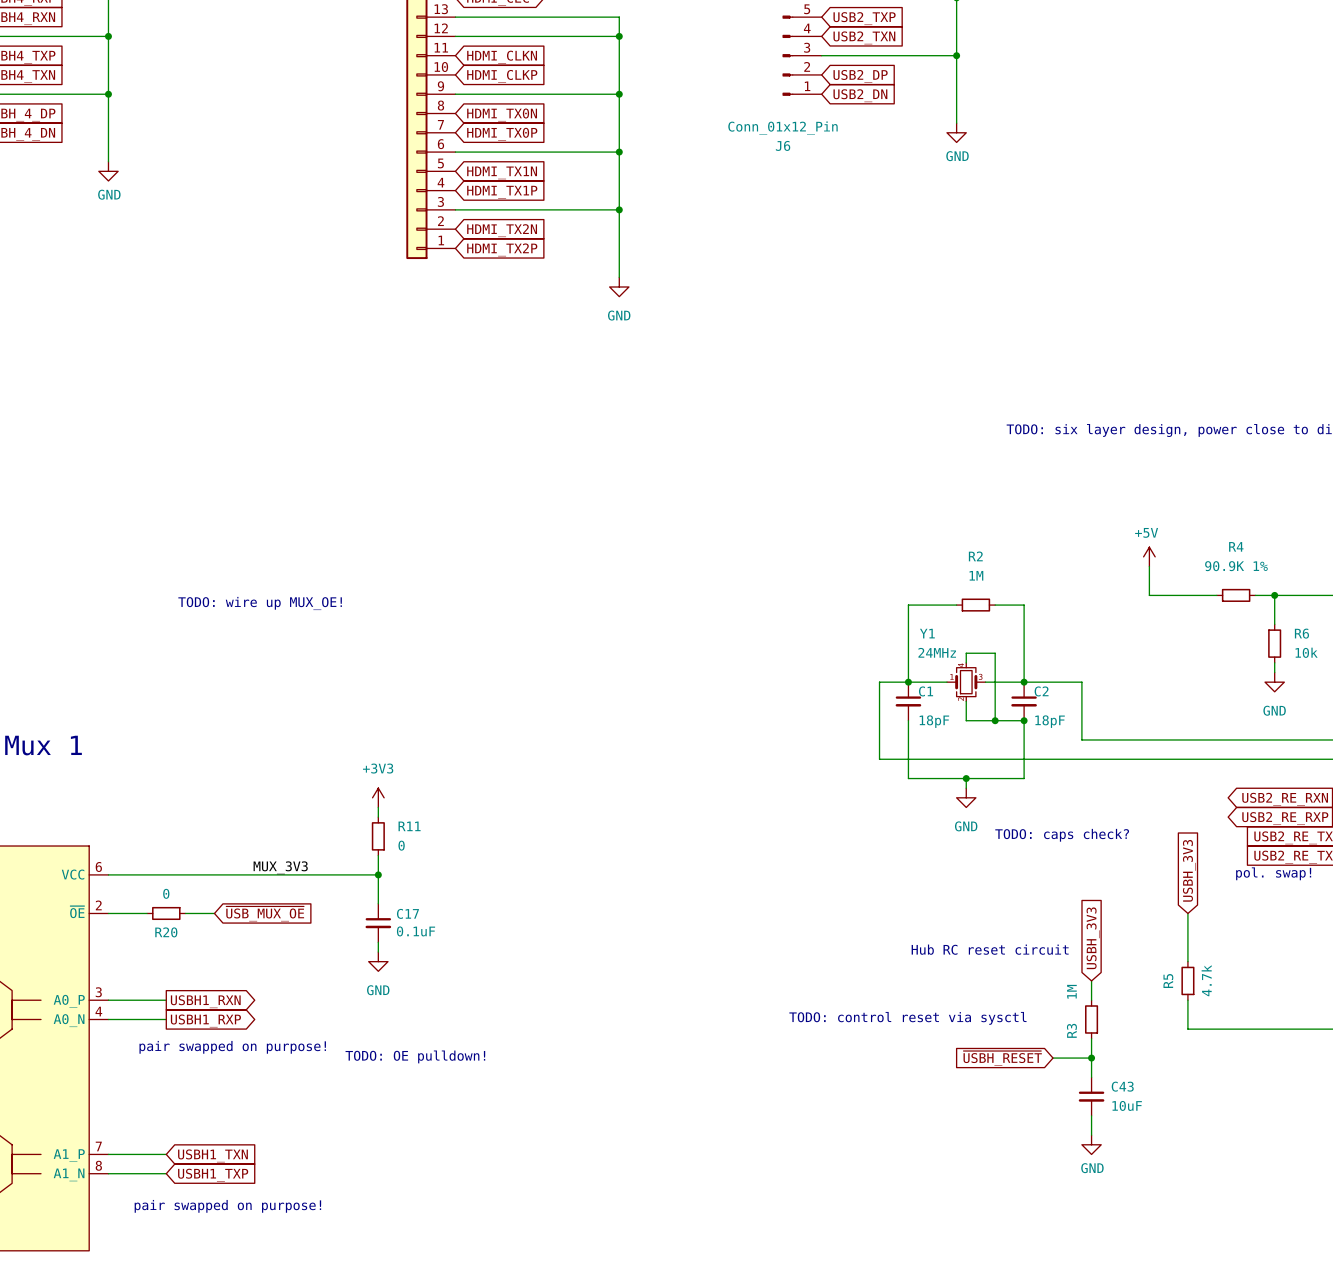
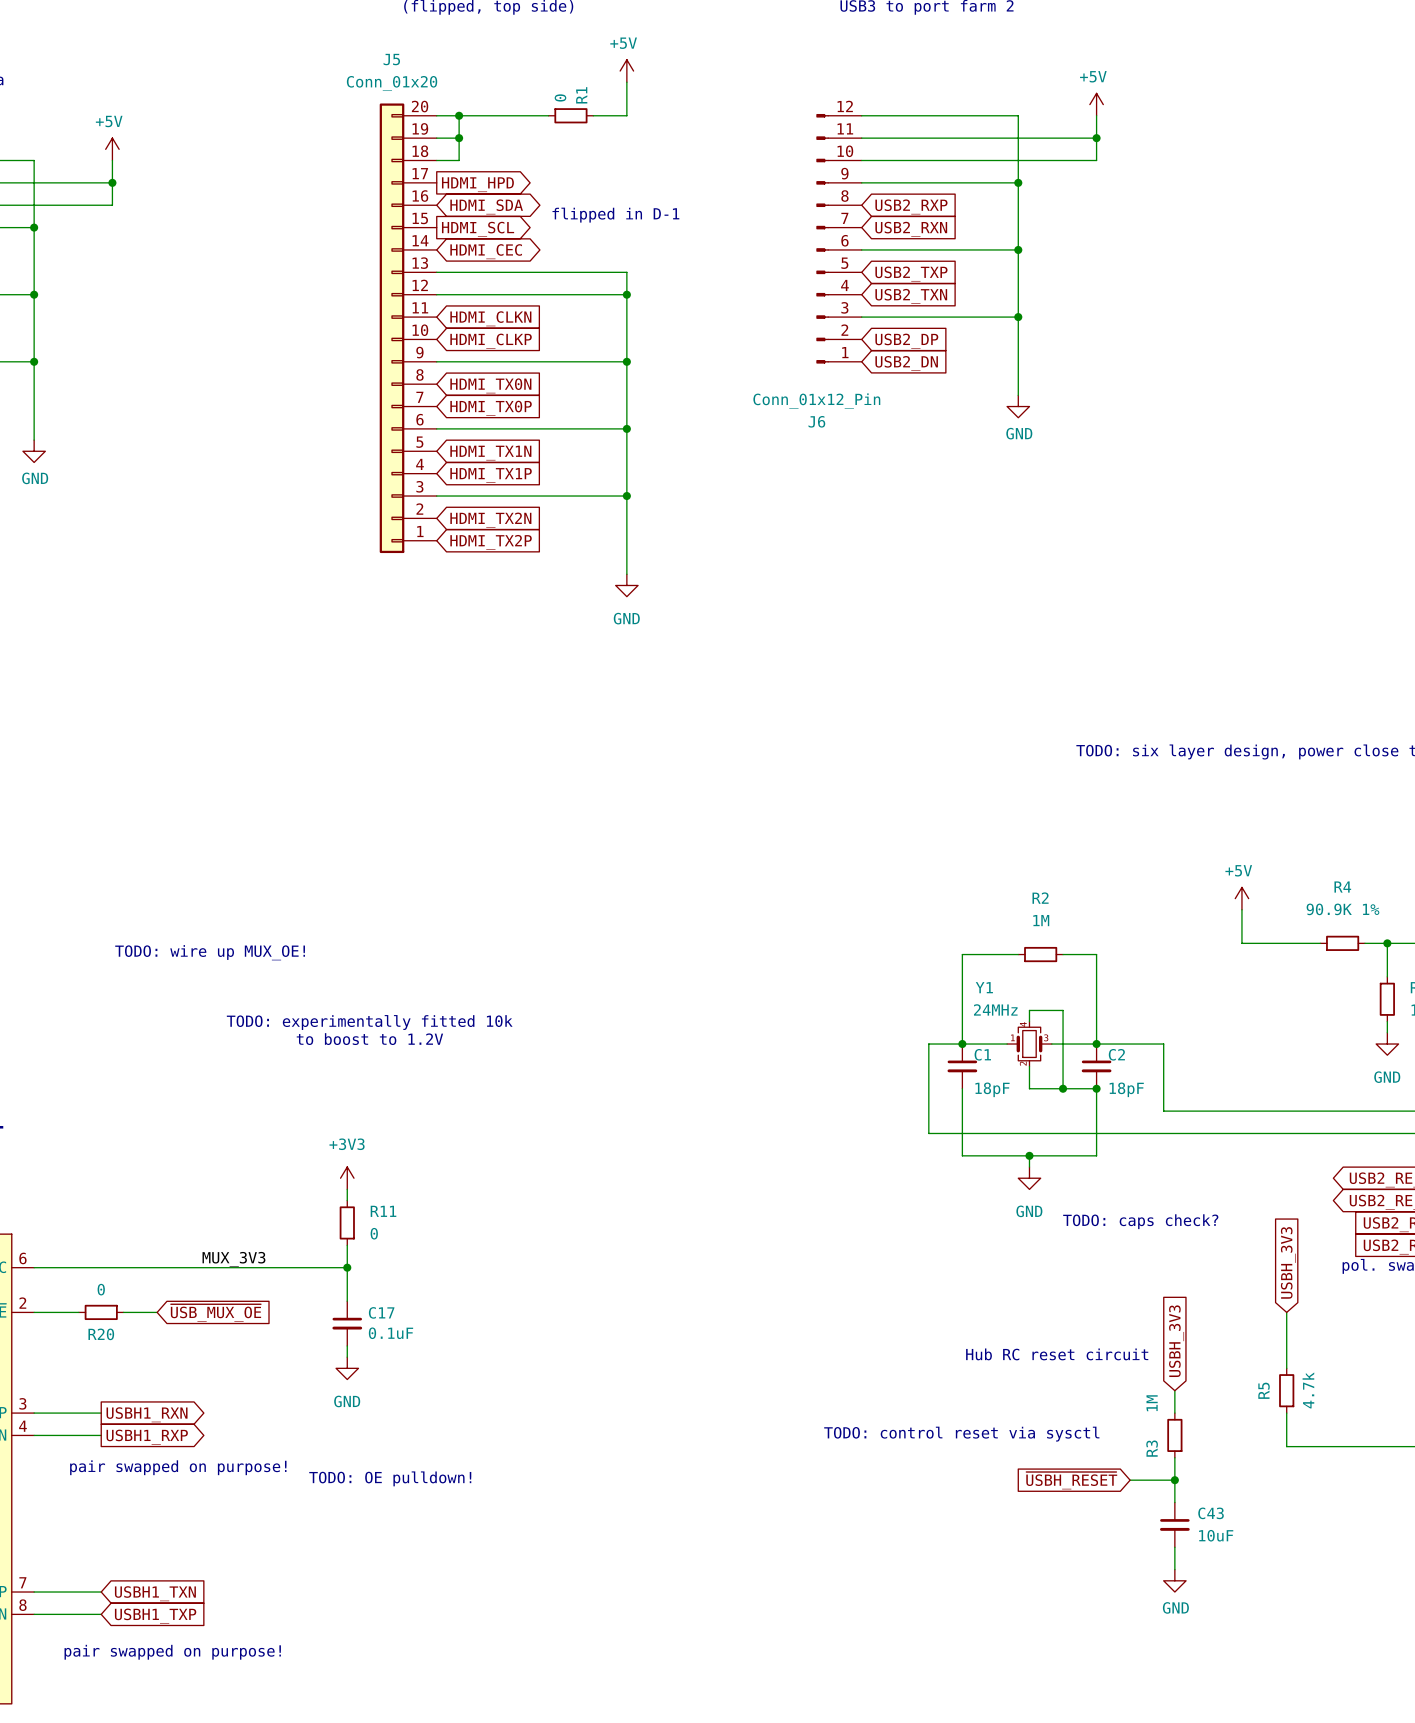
text: none -> TODO: experimentally fitted 10k (369, 1022)
text: none -> to boost to 1.2V (369, 1039)

